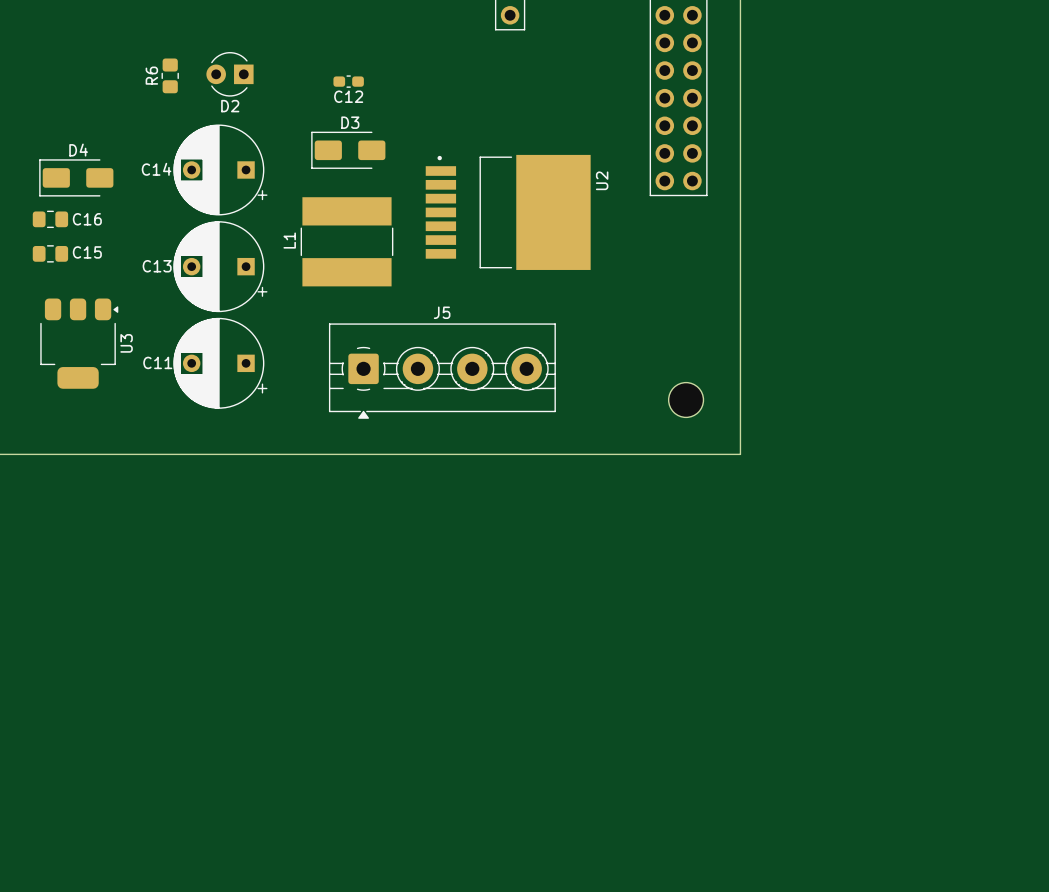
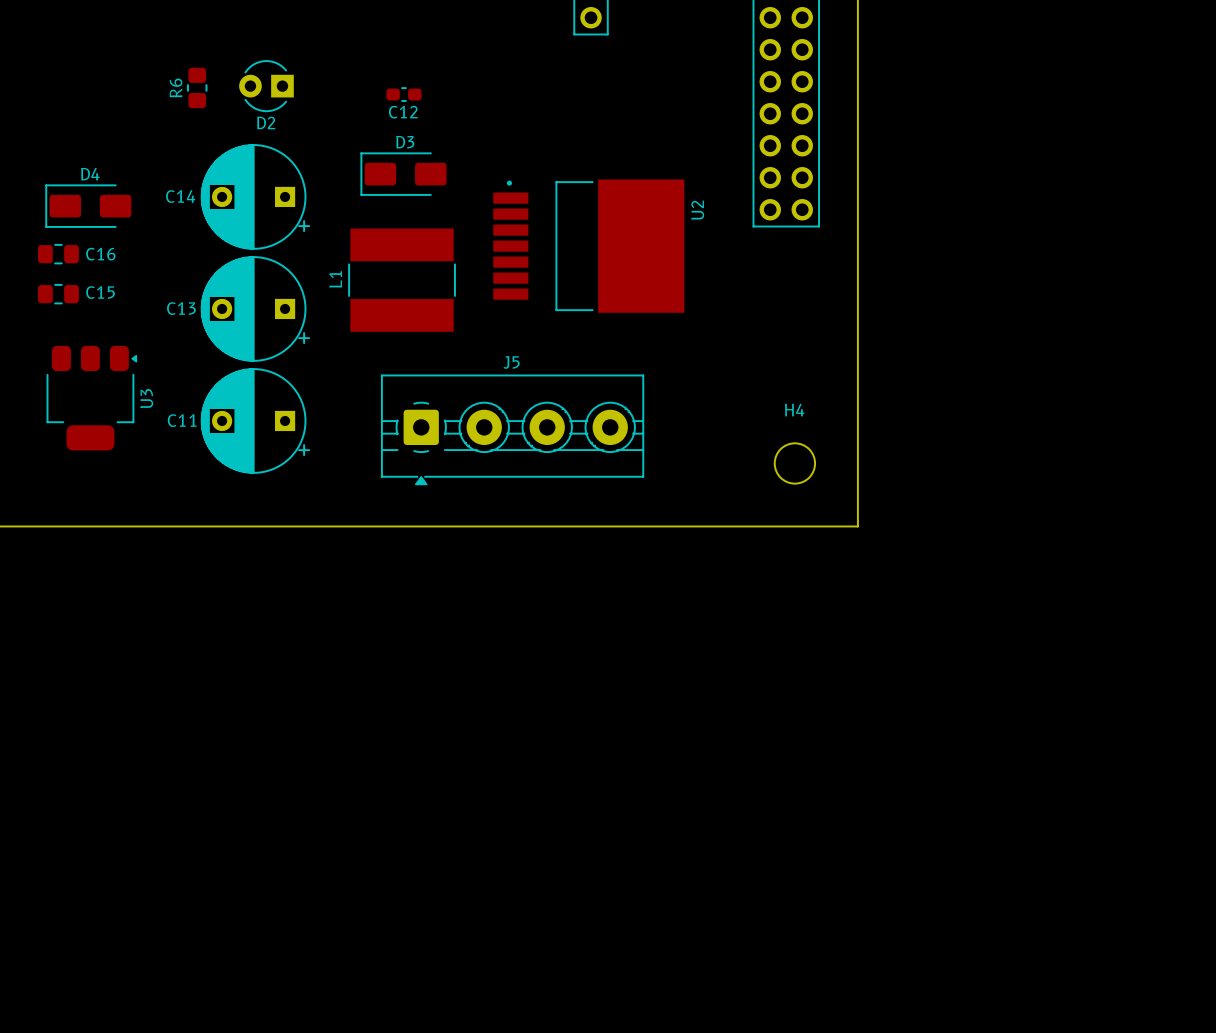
H4 name: none -> H4 (794, 410)

